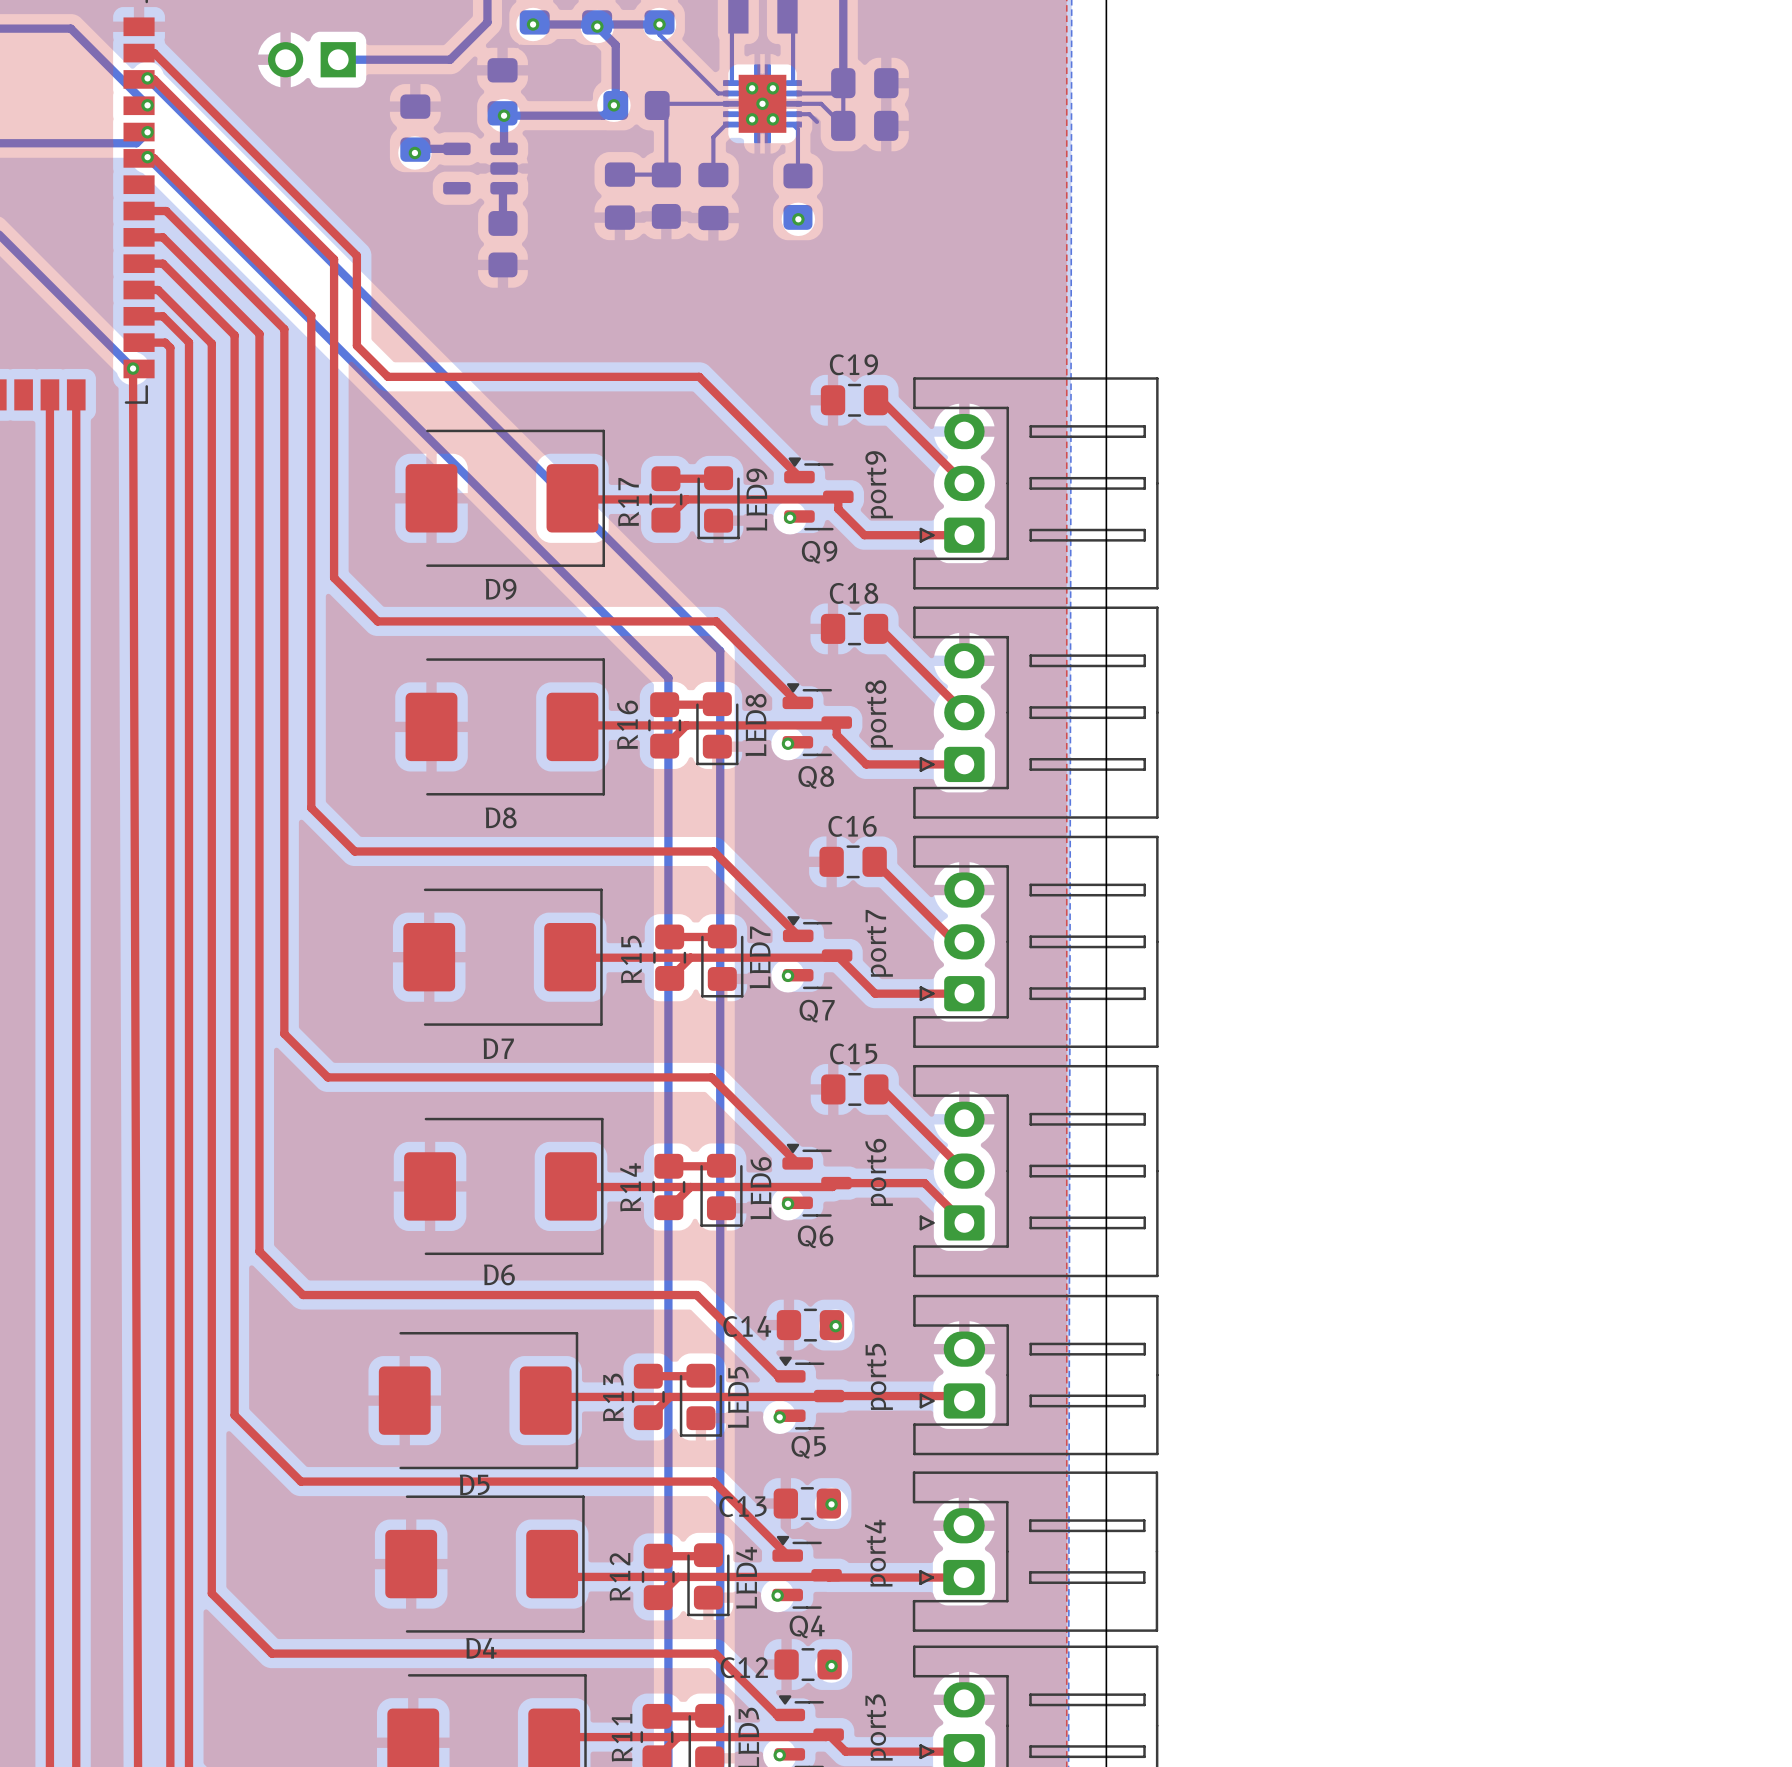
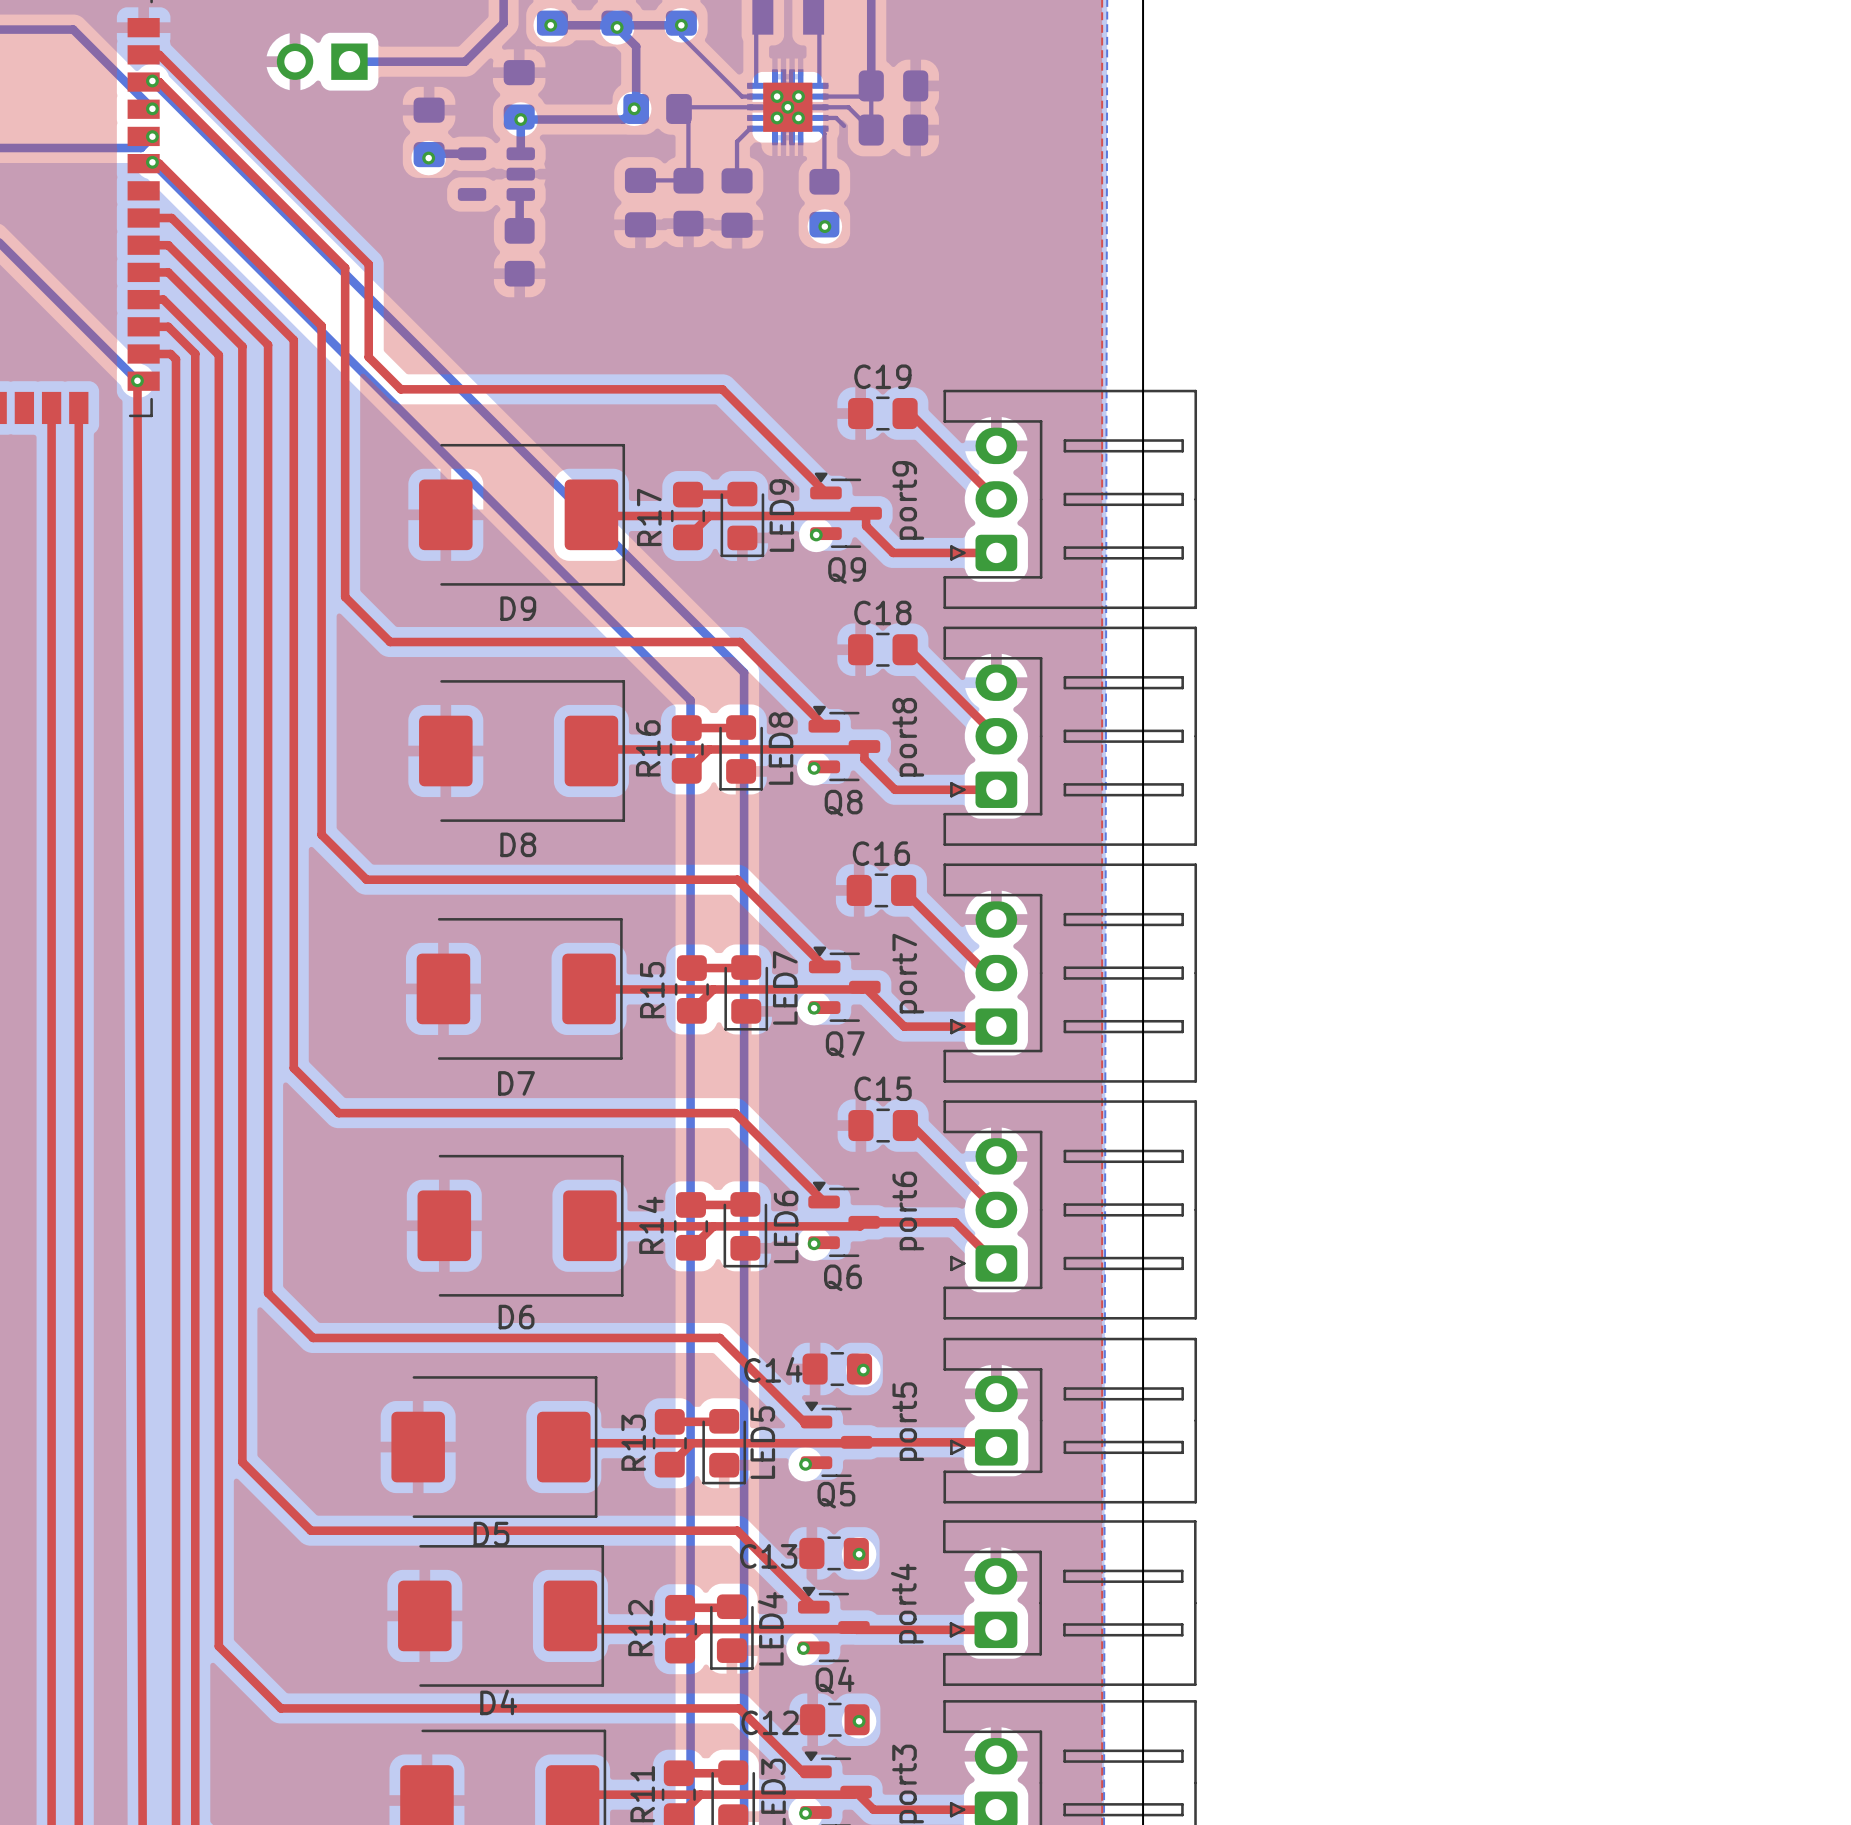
part footprint: [723, 64, 802, 144] -> [747, 69, 829, 146]

